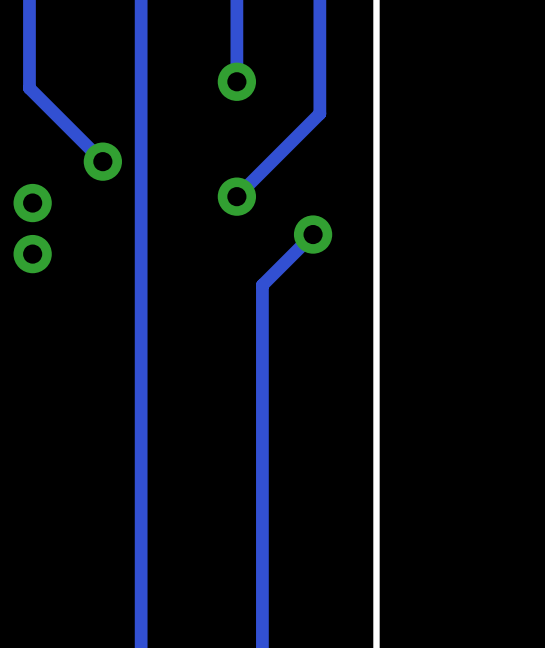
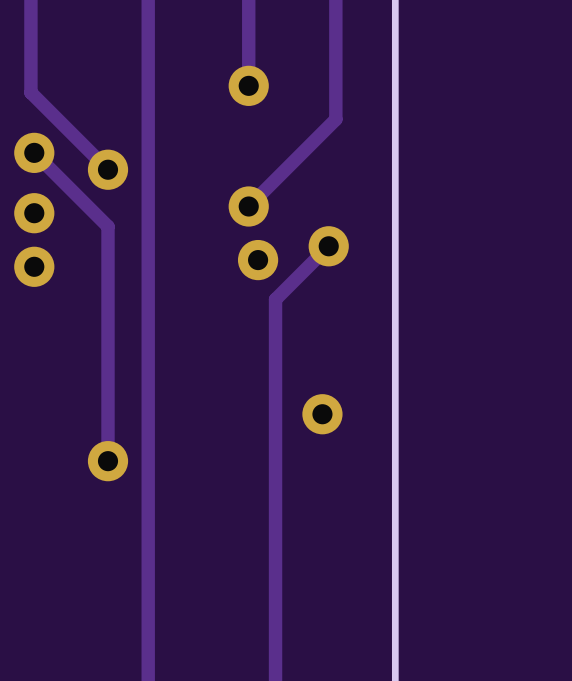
track: none -> (34, 152) (108, 226) (108, 461)
via: none -> (34, 152)
via: none -> (258, 260)
via: none -> (322, 414)
via: none -> (108, 461)

